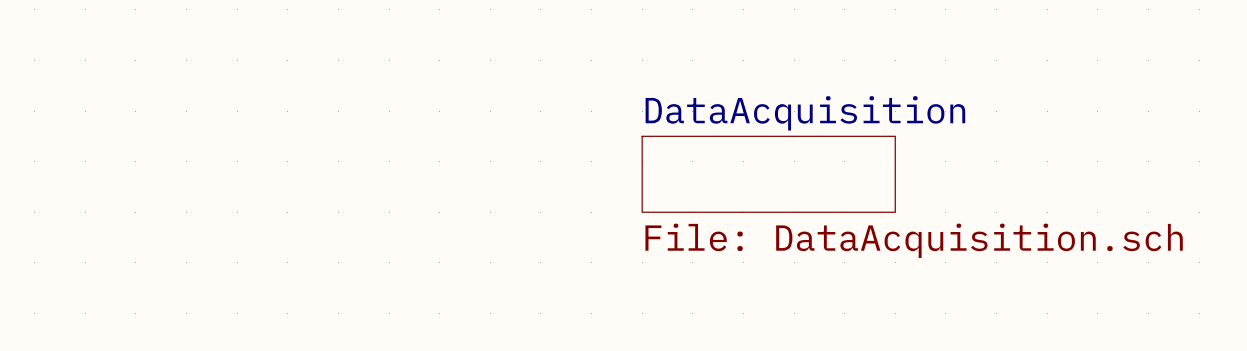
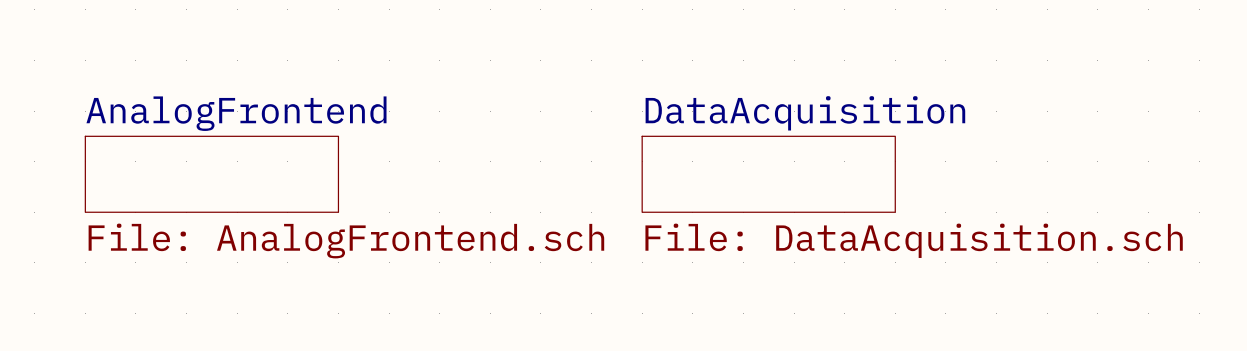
sheet AnalogFrontend: none -> File: AnalogFrontend.sch (211, 174)

